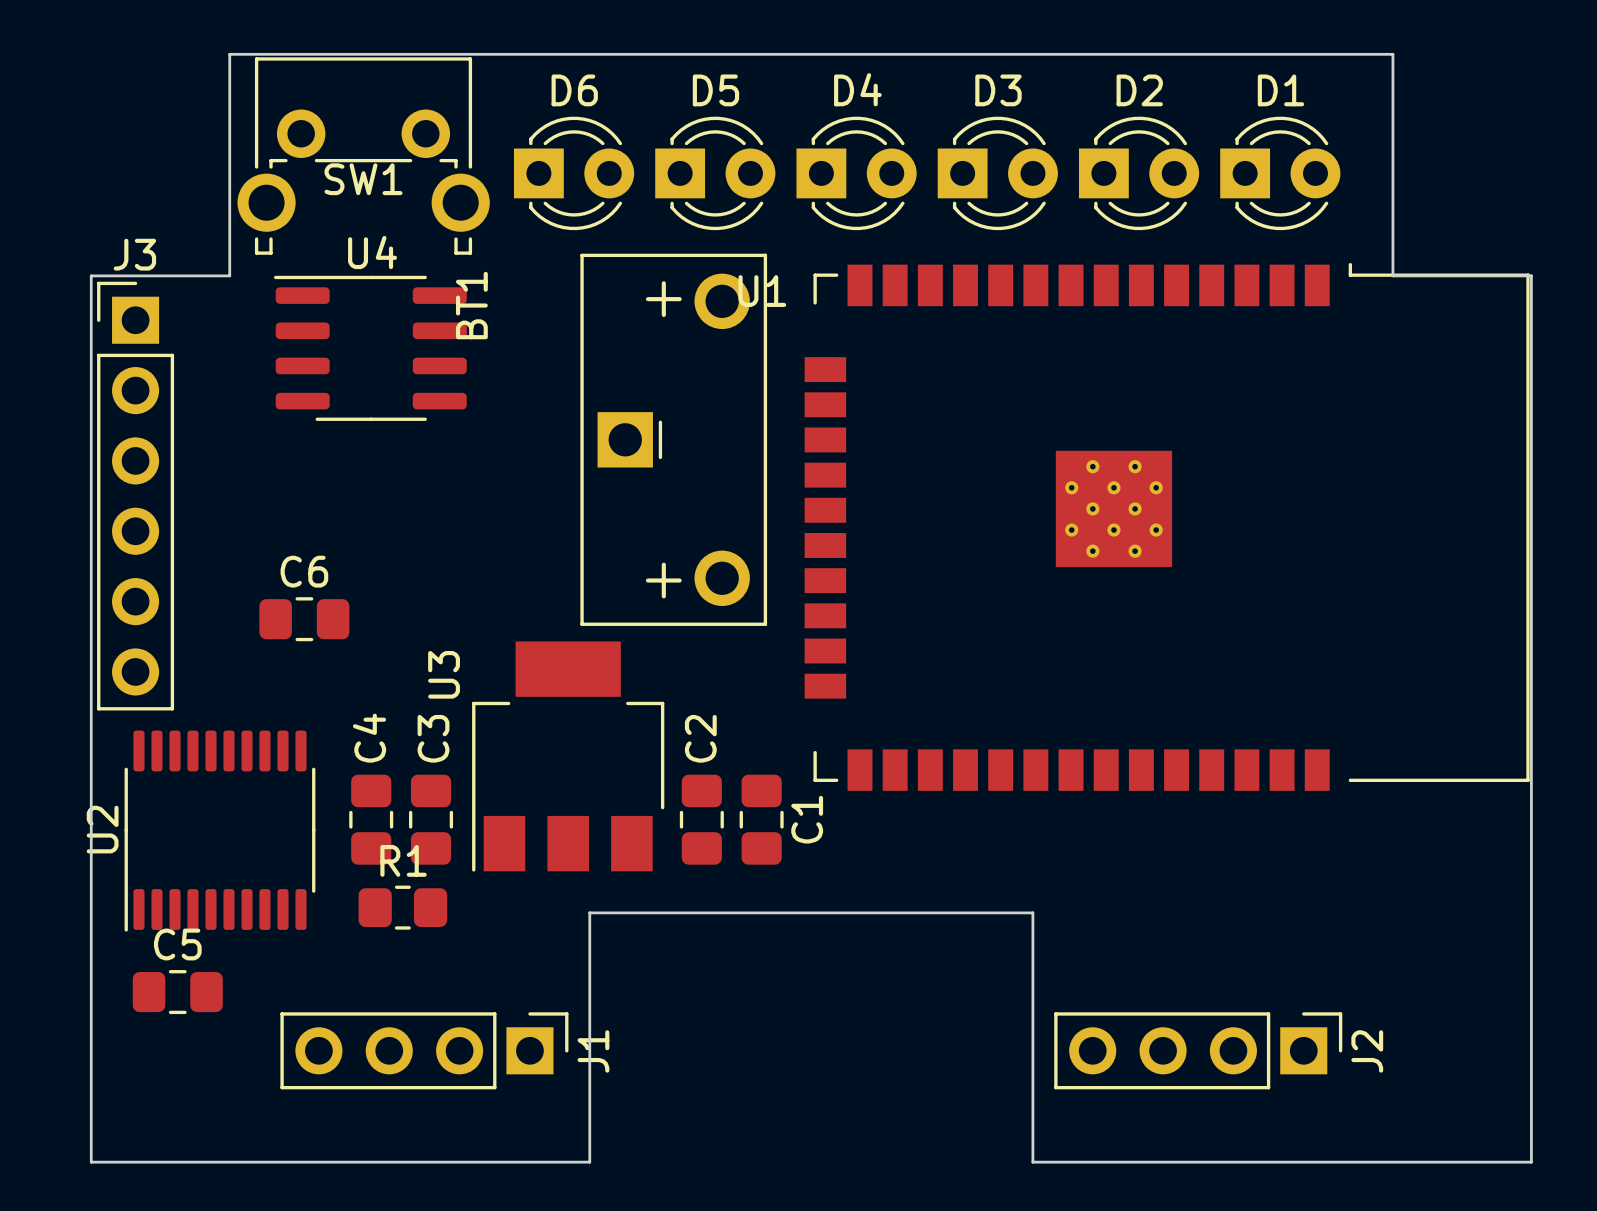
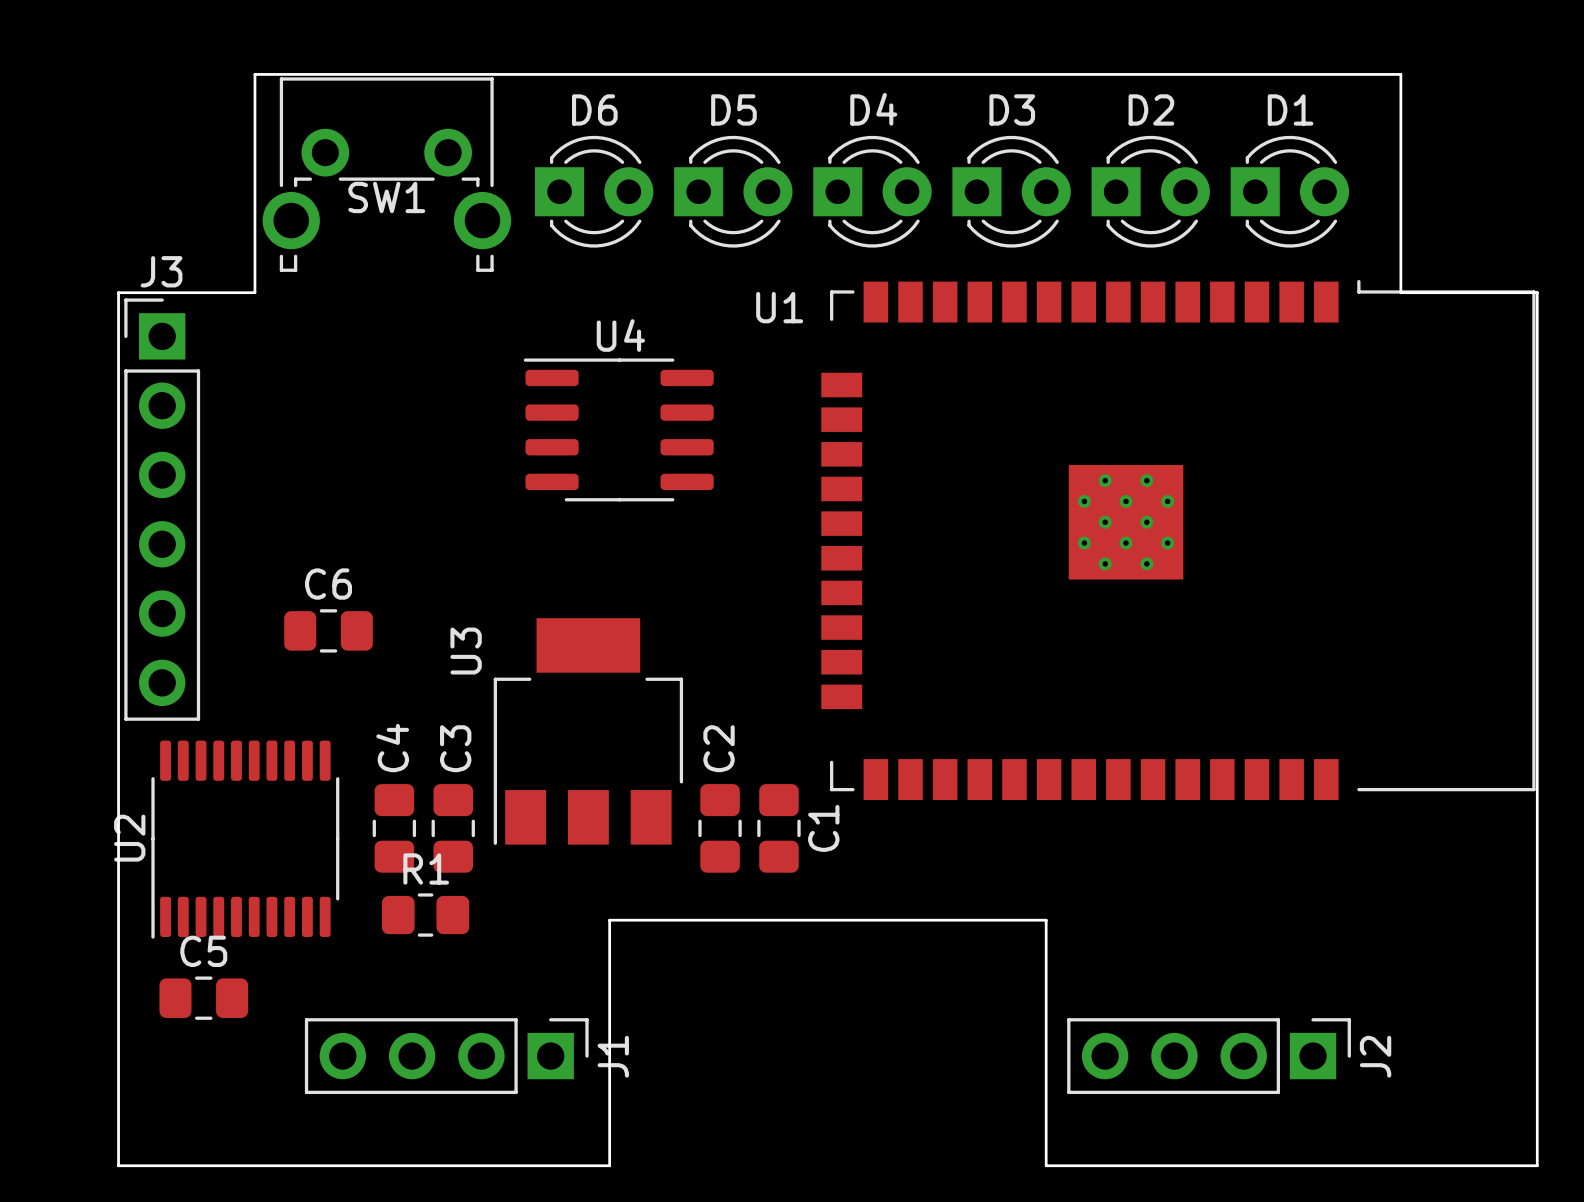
U4 position: (370, 348) -> (618, 429)
BT1: (673, 439) -> none
U3 position: (568, 756) -> (588, 731)

